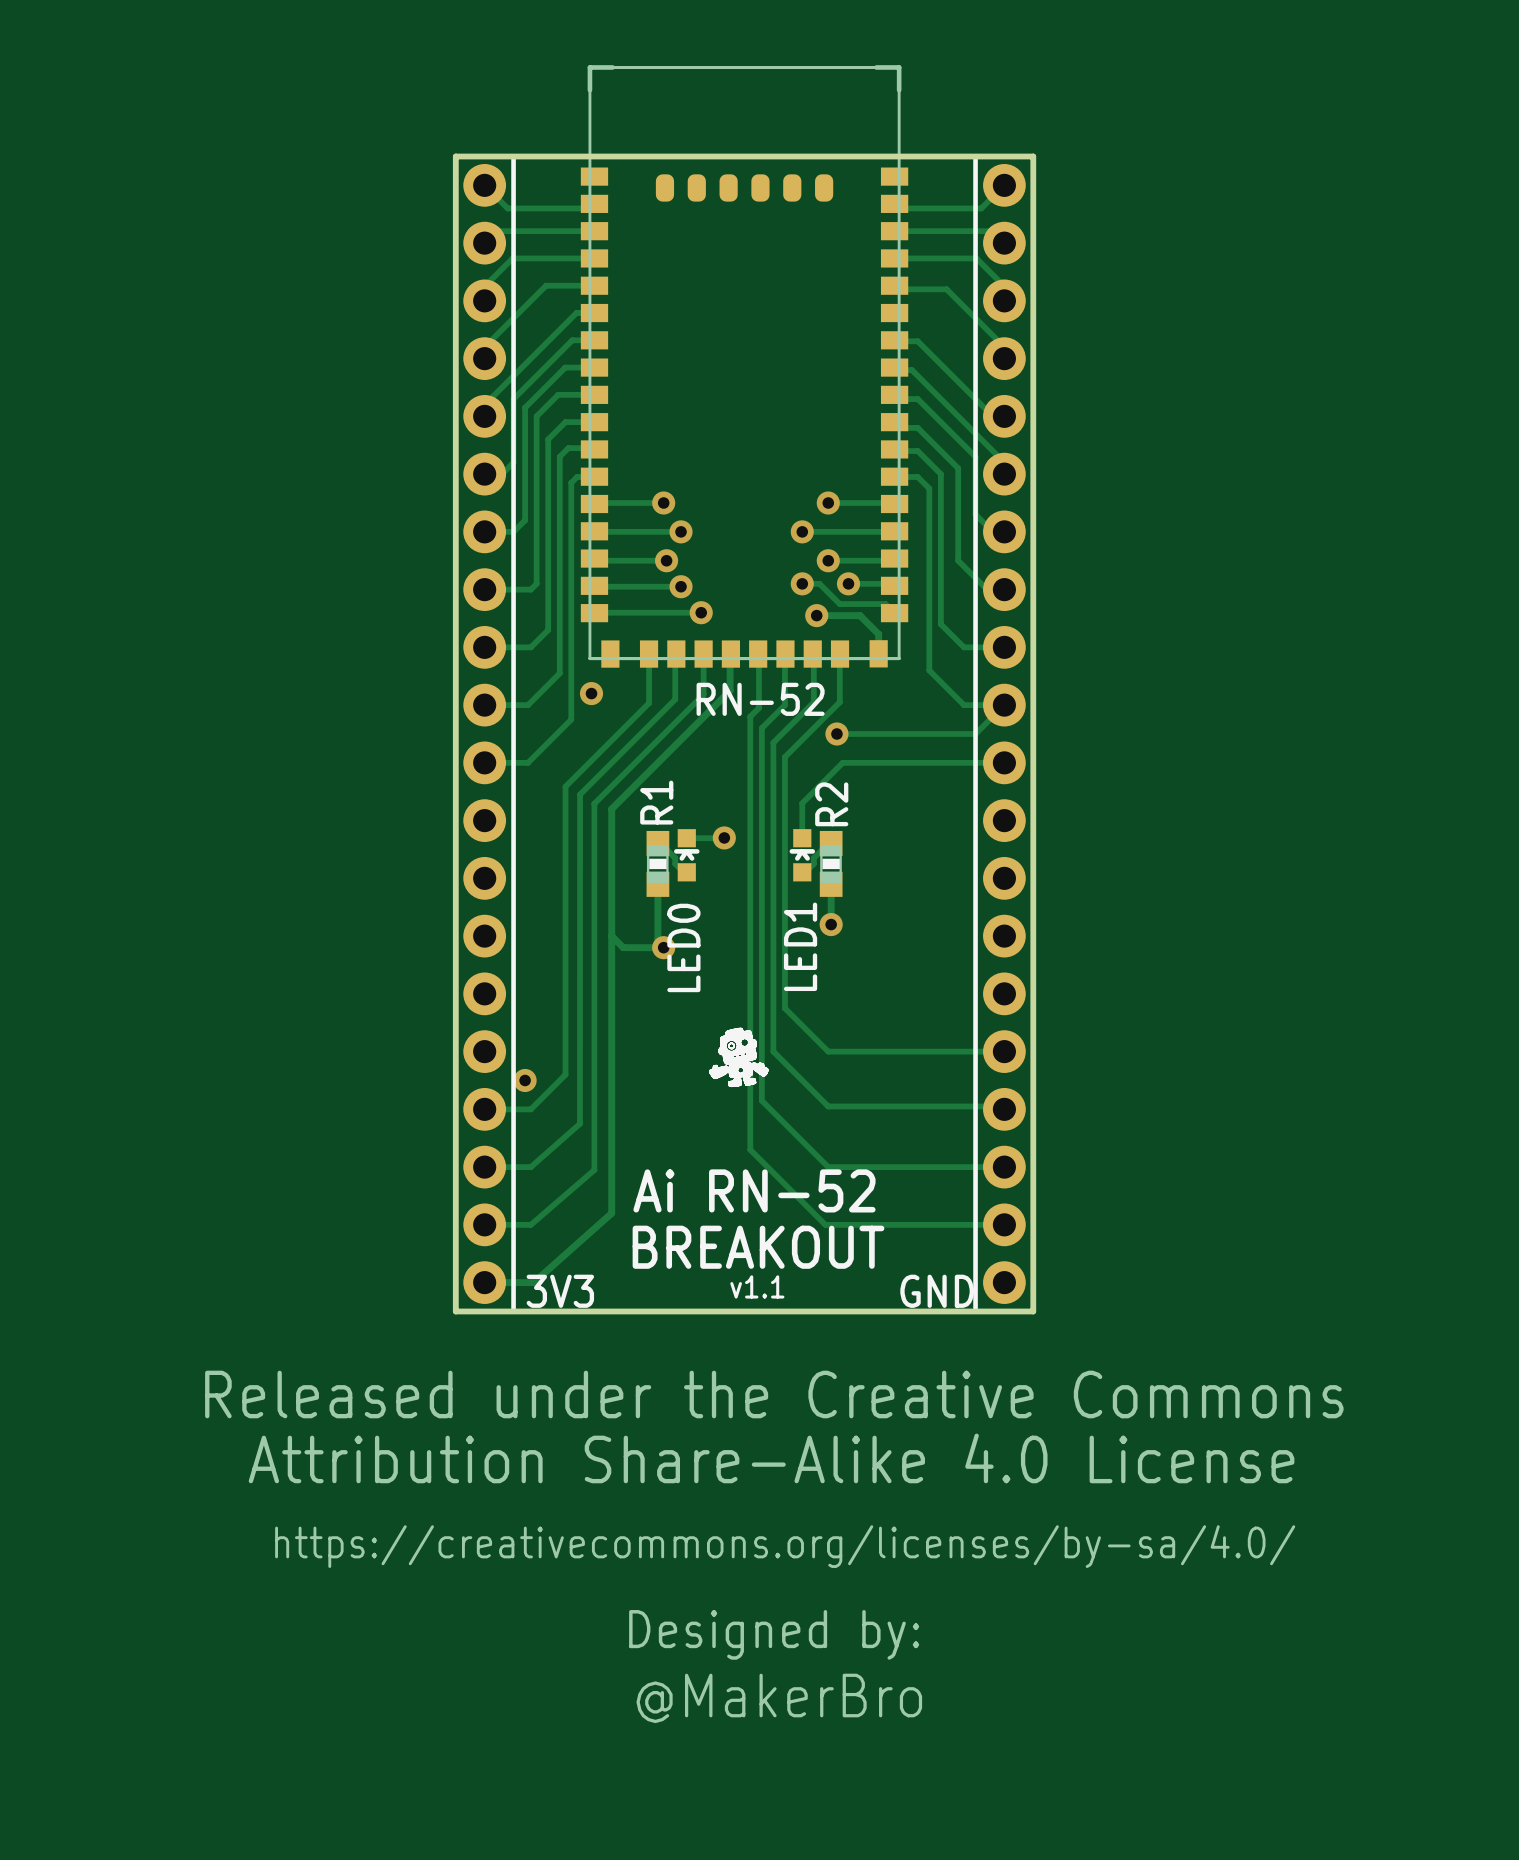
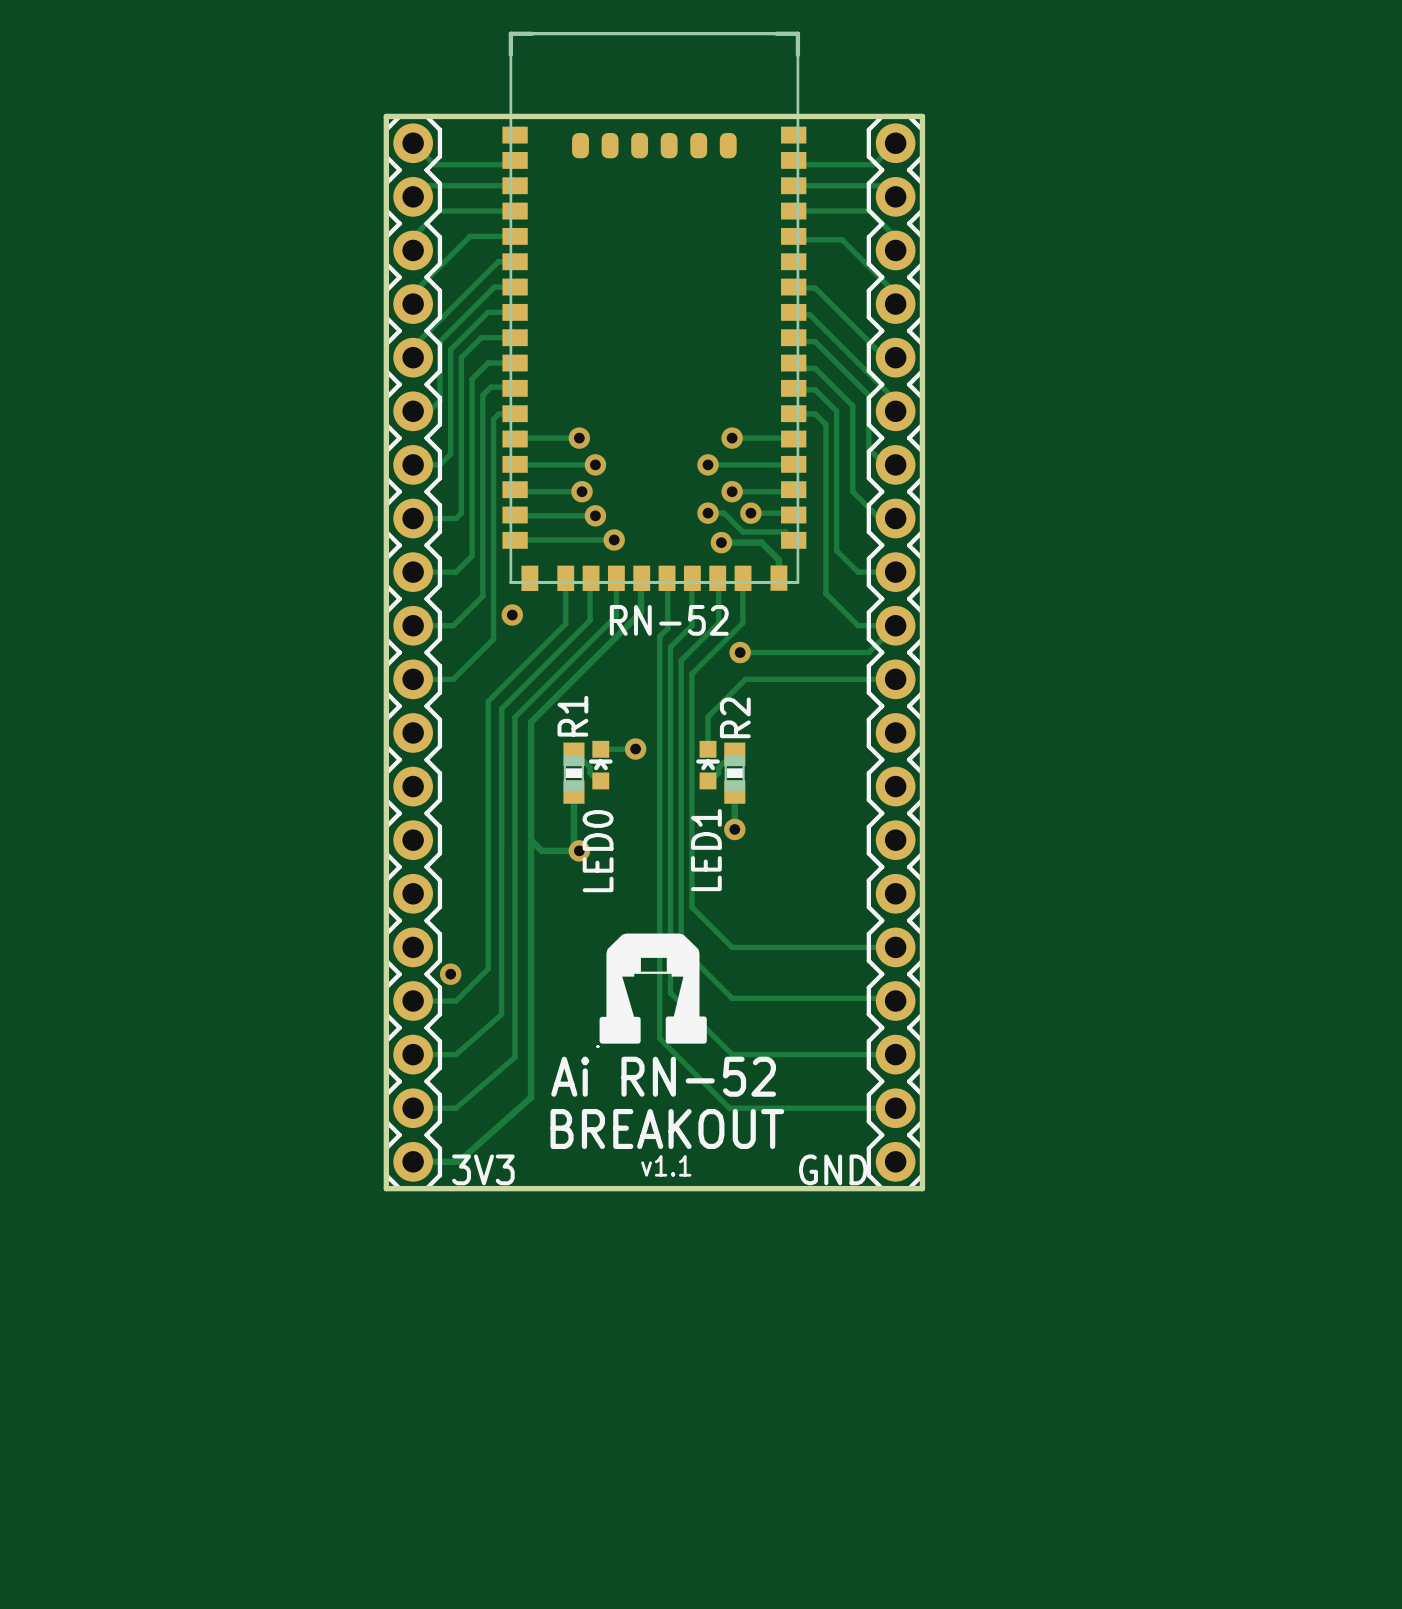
part footprint: [453, 154, 516, 1314] -> [384, 114, 443, 1191]
part footprint: [973, 154, 1036, 1314] -> [866, 114, 925, 1191]
drawing: [709, 1027, 769, 1087] -> none
drawing: none -> [599, 933, 707, 1044]
drawing: [205, 1370, 1344, 1660] -> none
text: @MakerBro (779, 1698) -> none

